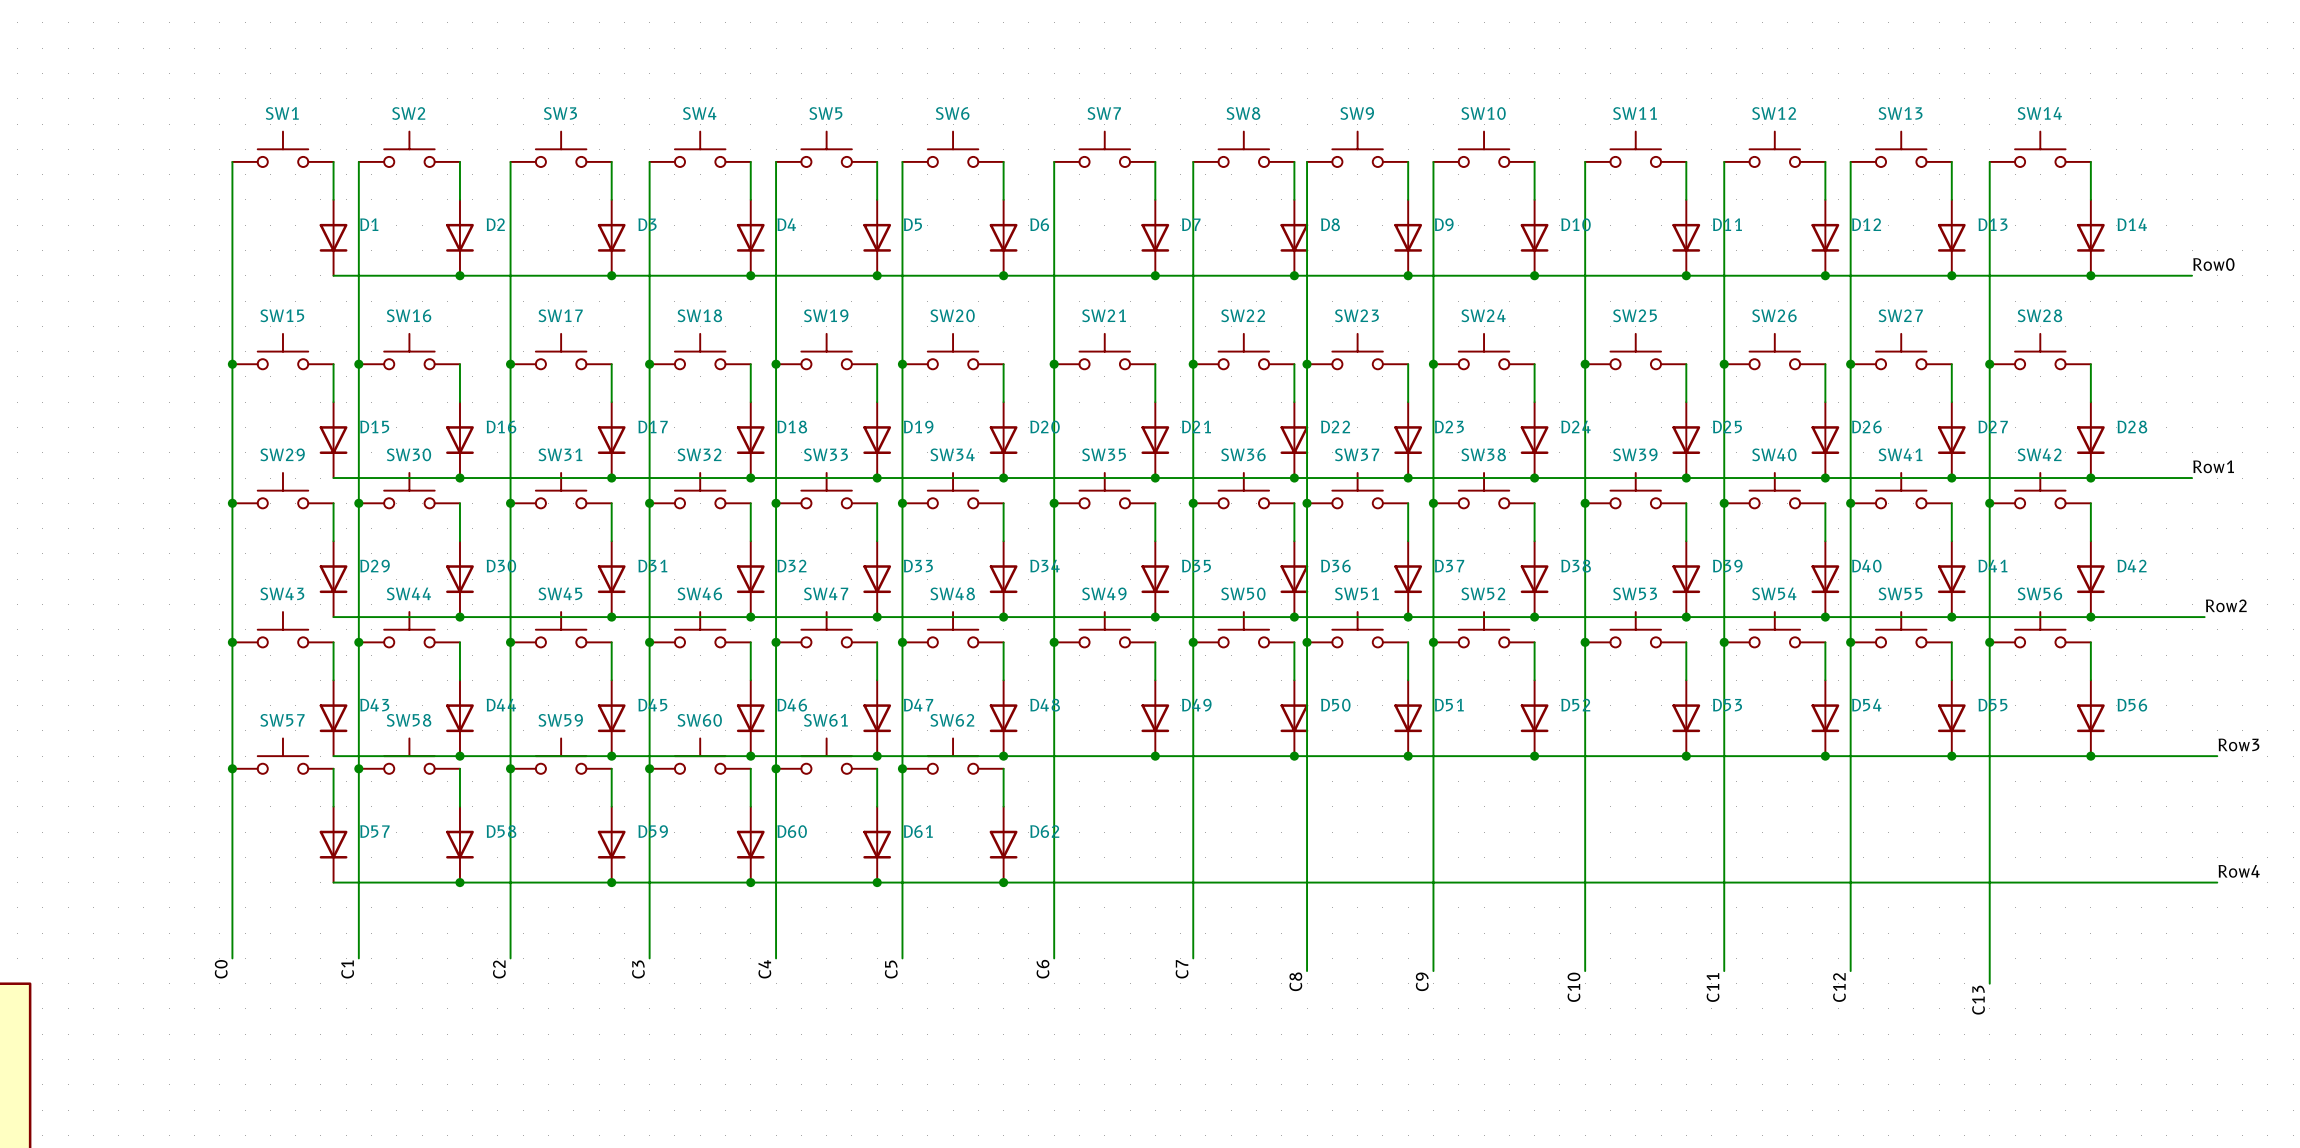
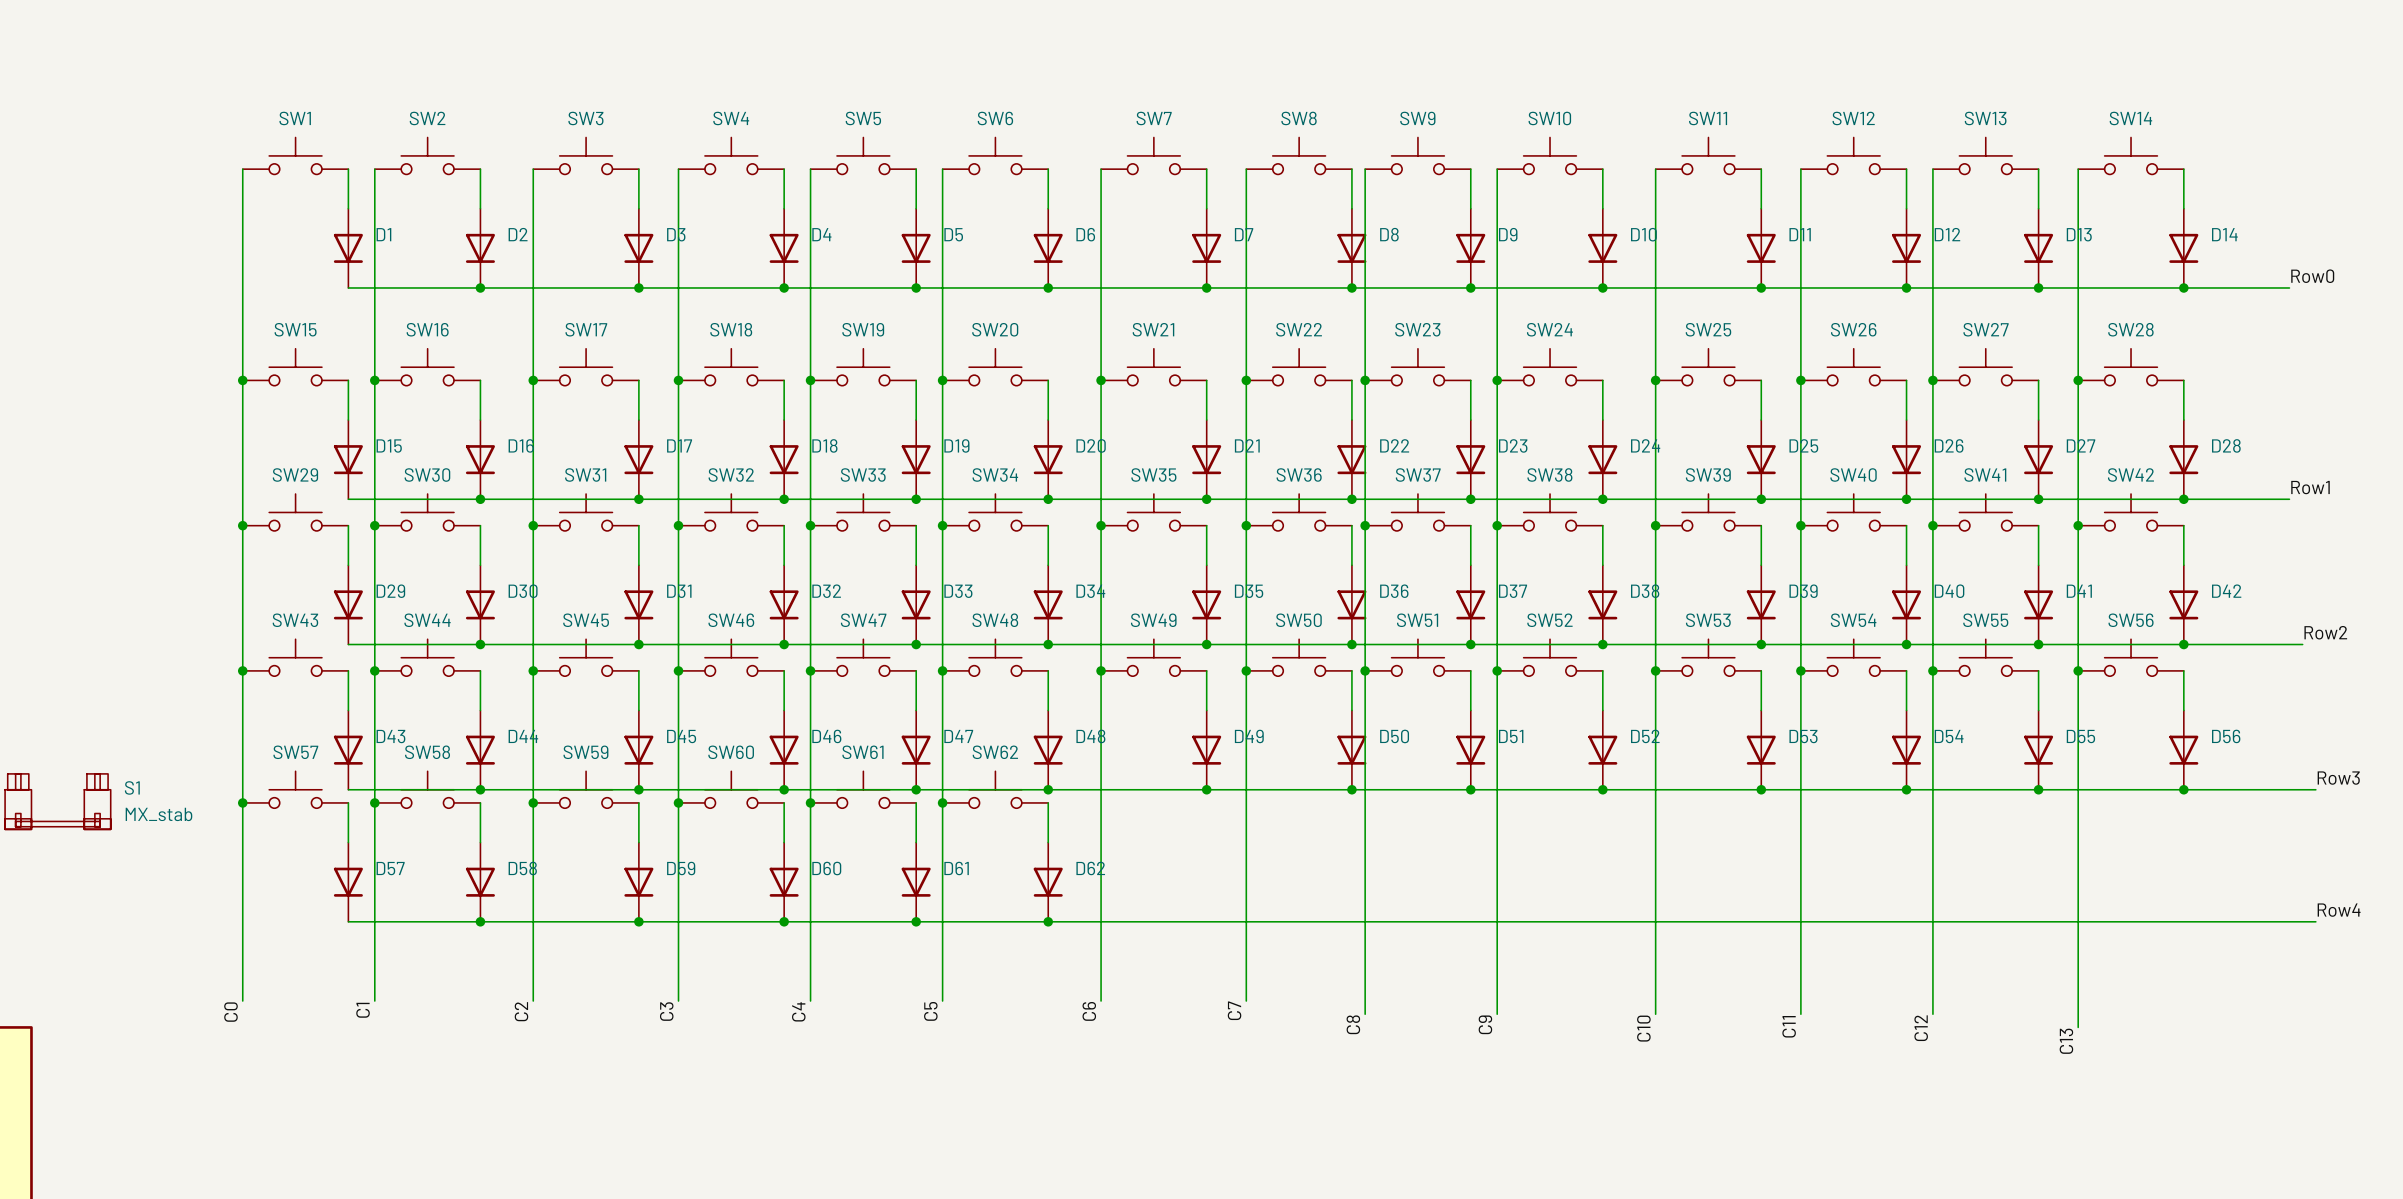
S1: none -> MX_stab (57, 801)

